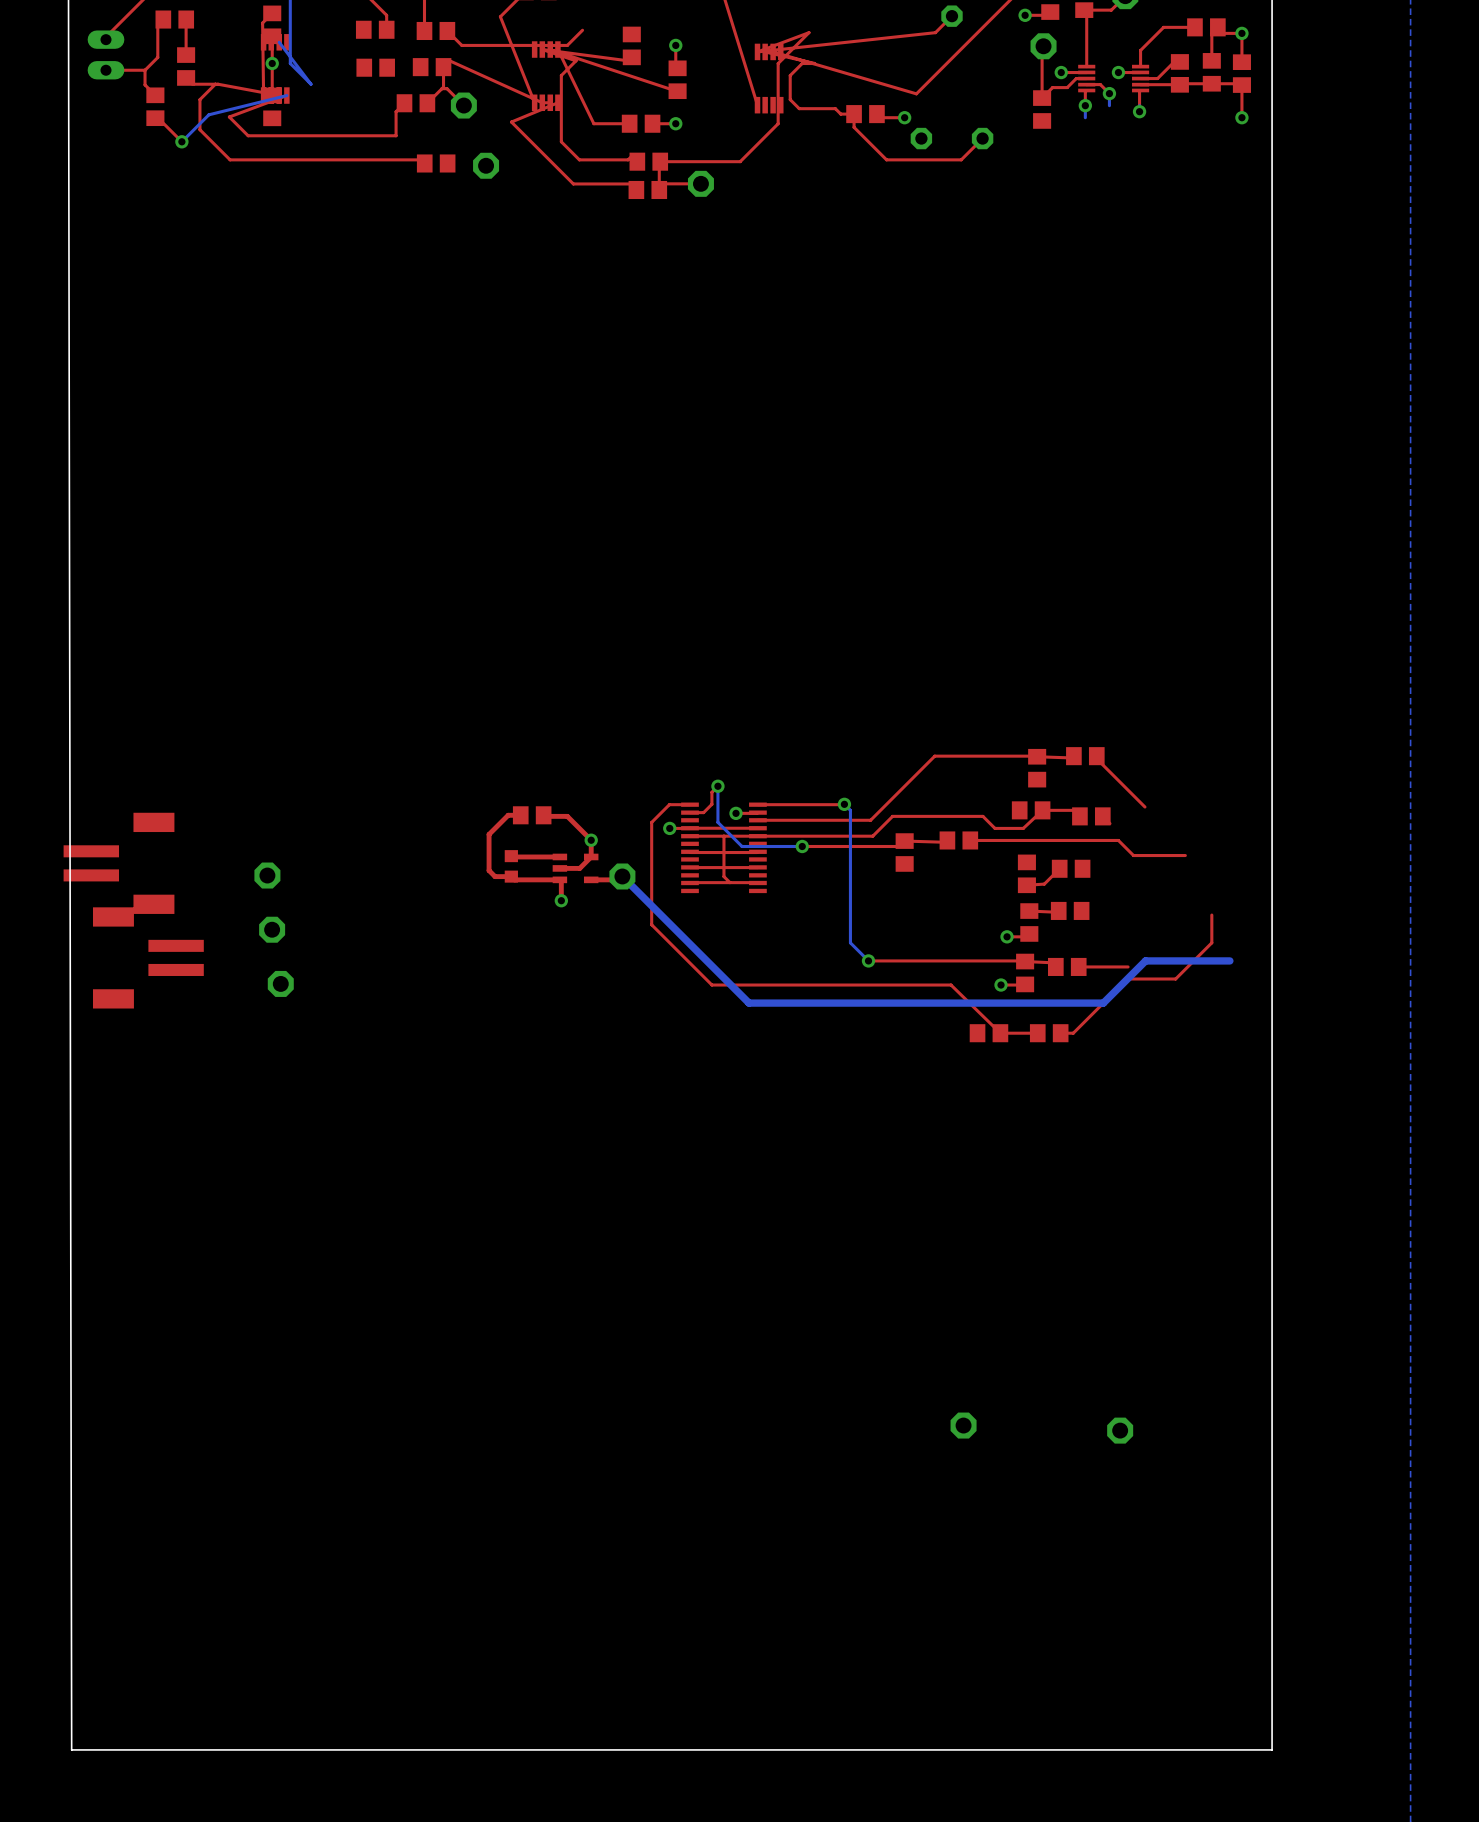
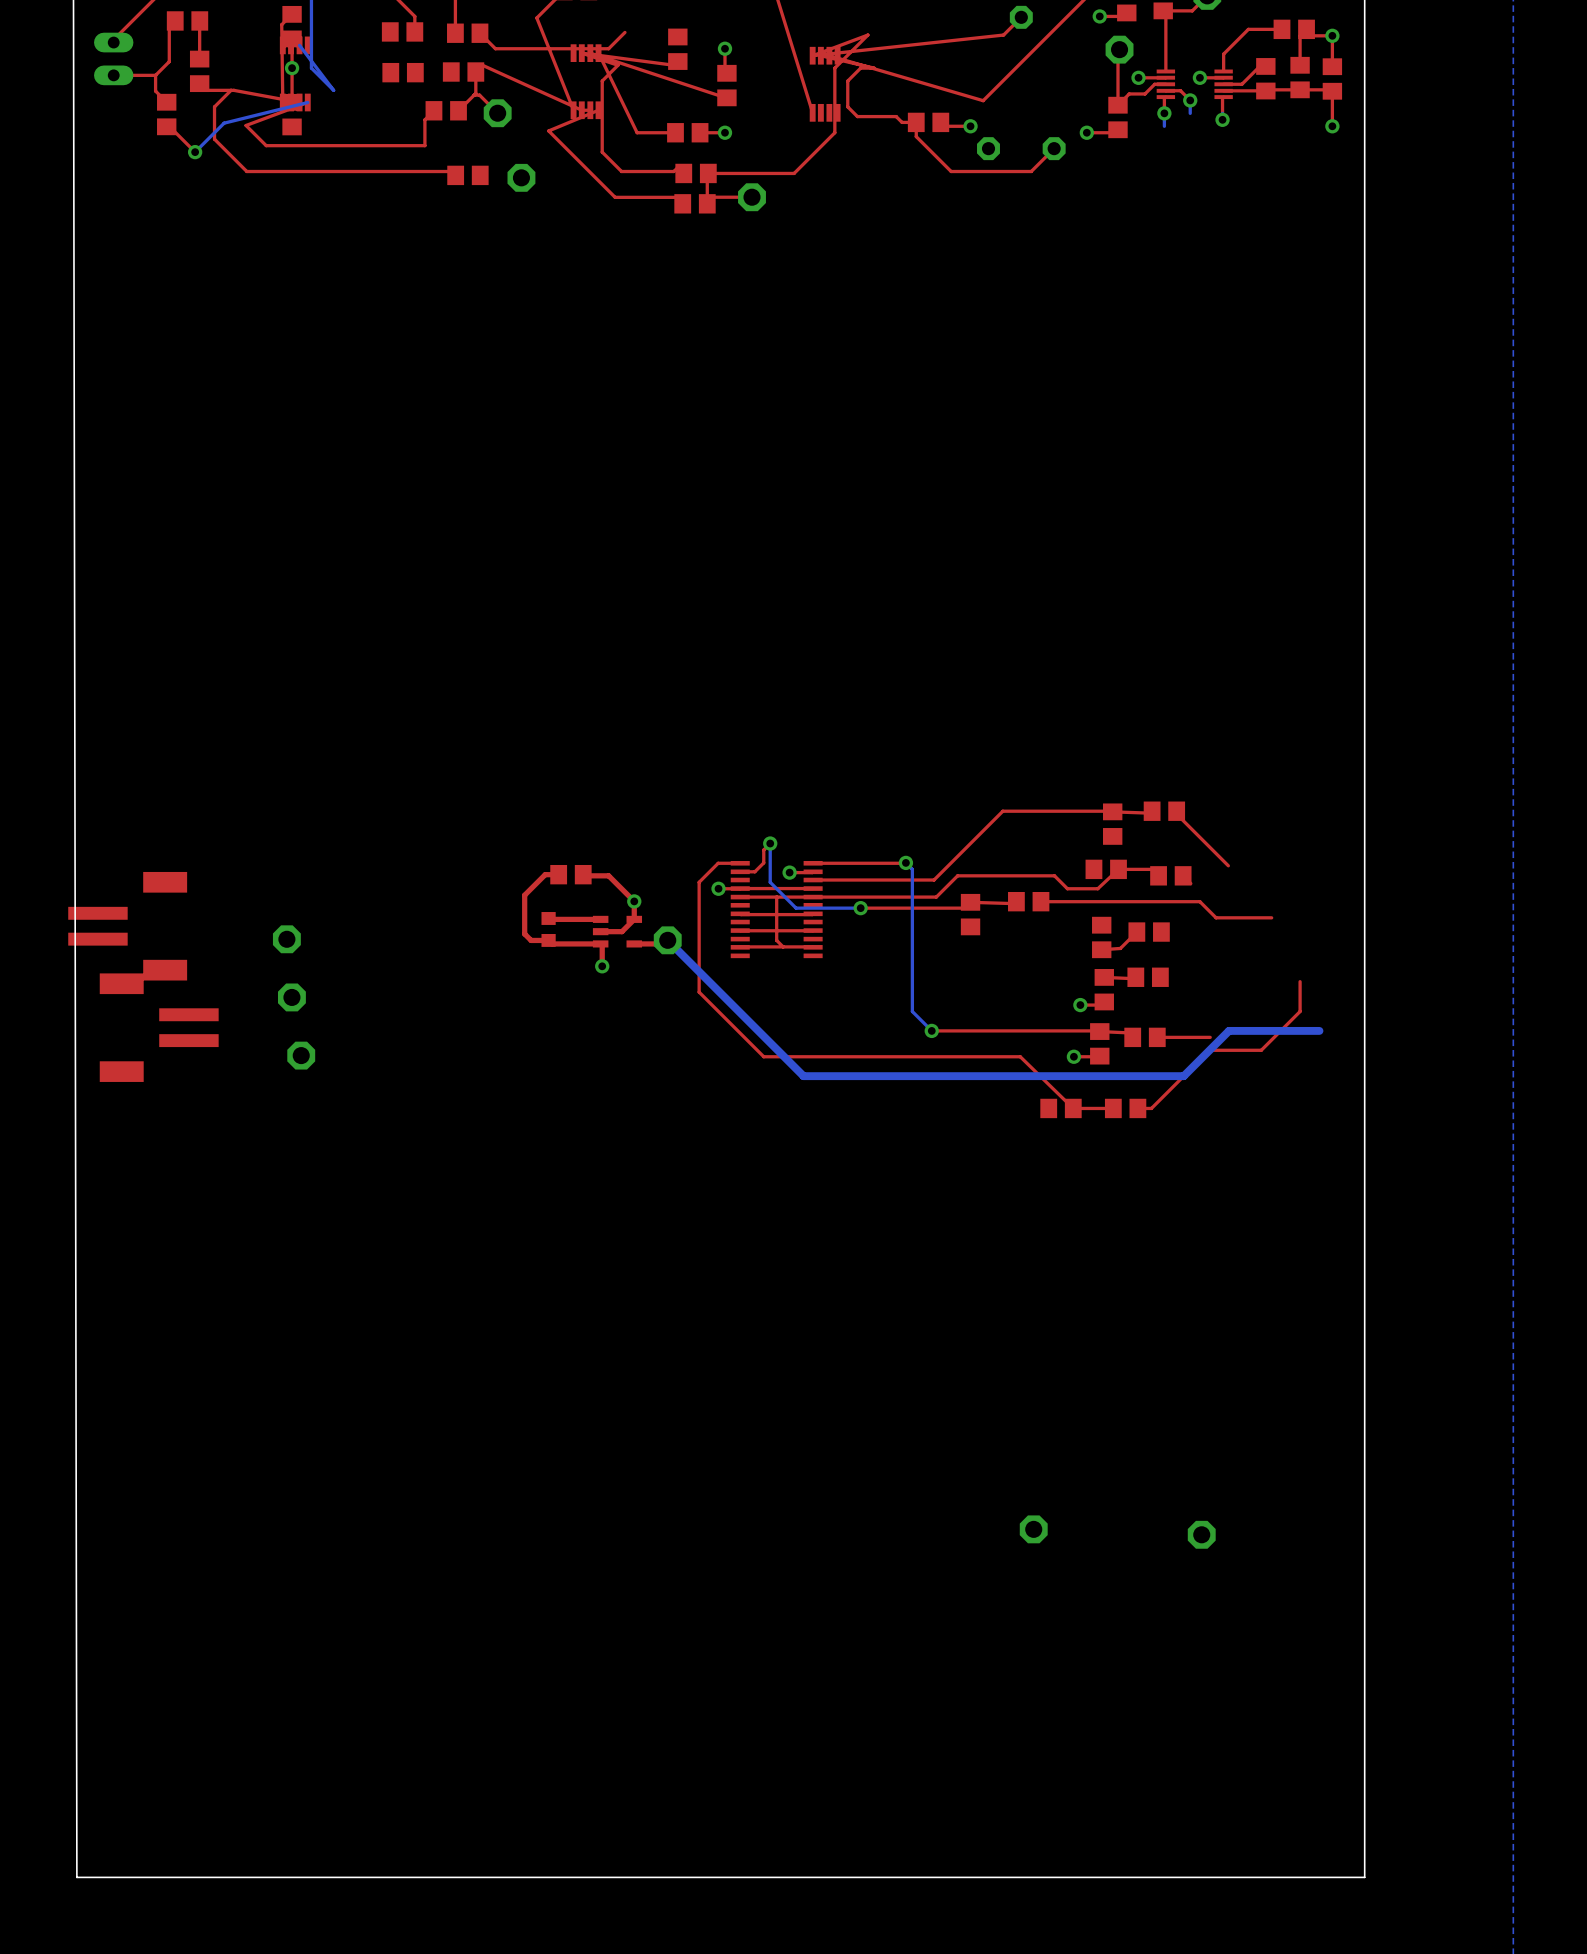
top track: none -> (1117, 129) (1115, 132) (1086, 132)
via: none -> (1086, 132)

